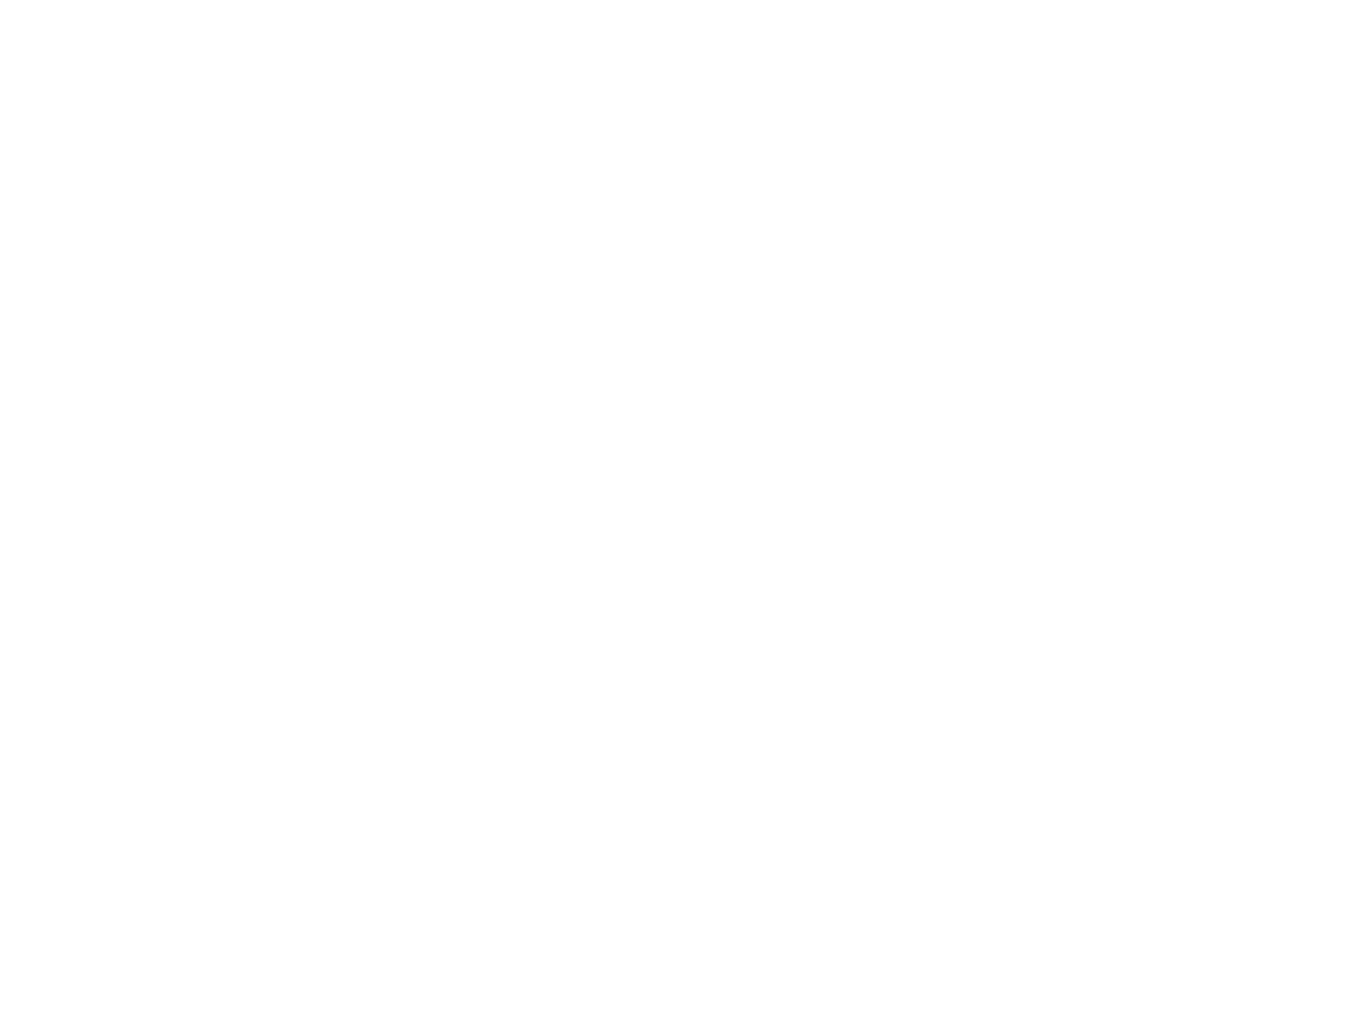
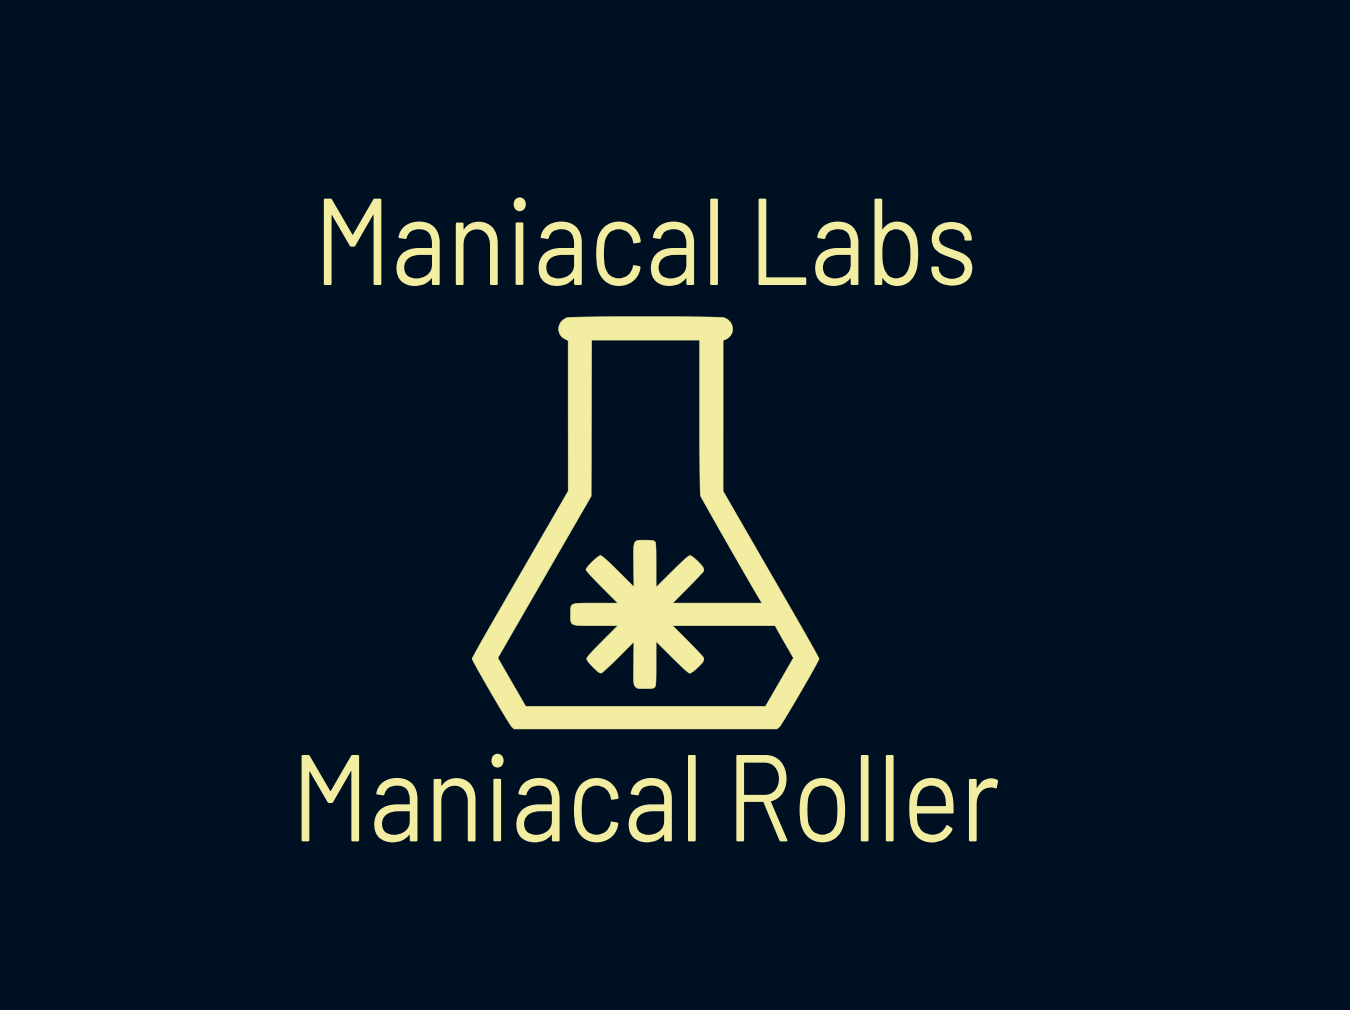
text: none -> Maniacal Labs (648, 241)
drawing: none -> [471, 316, 820, 730]
text: none -> Maniacal Roller (649, 798)

